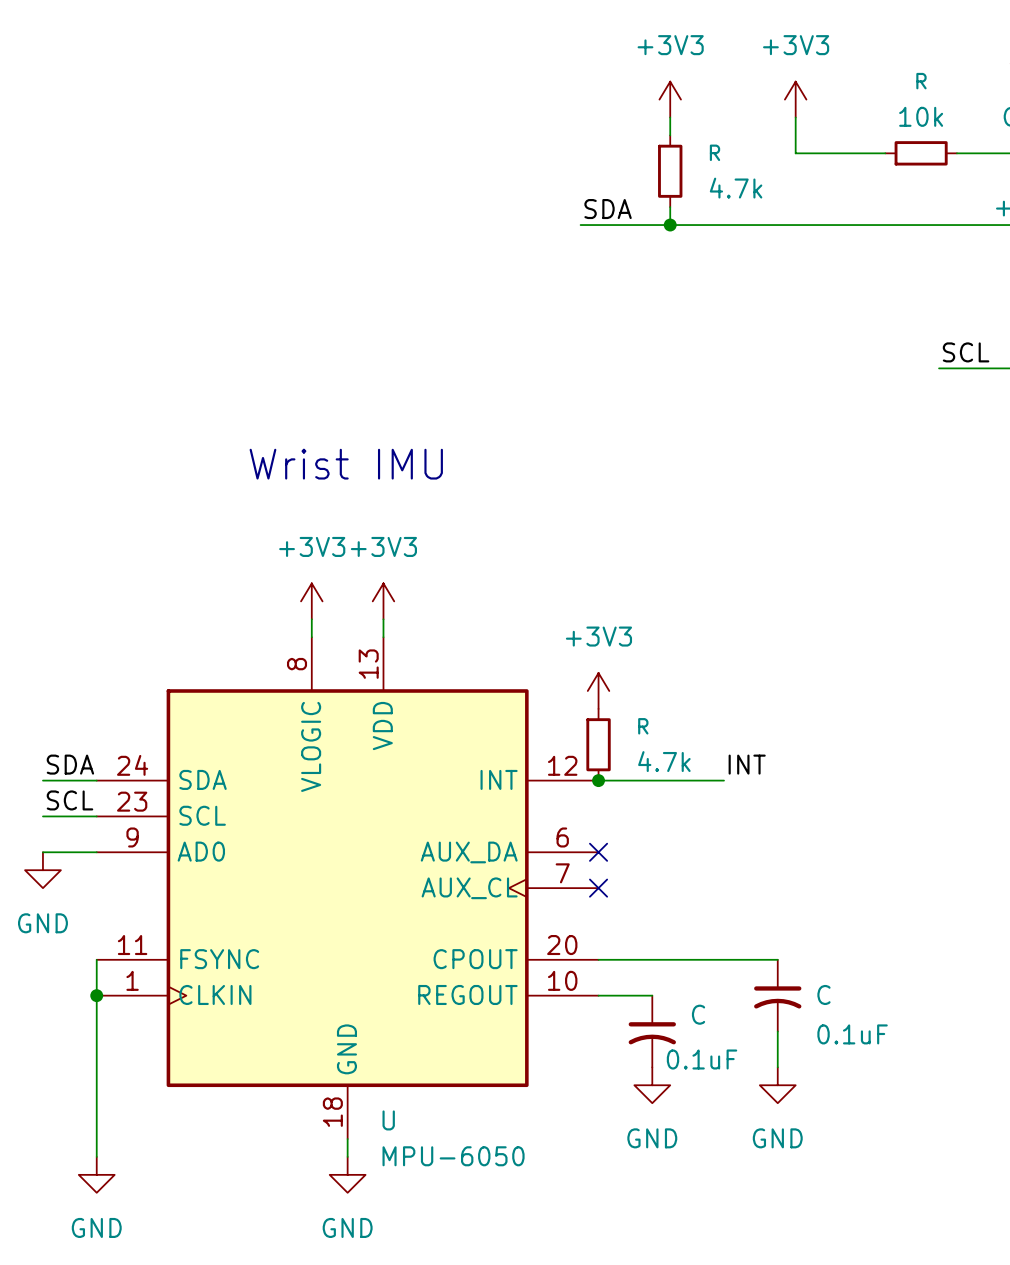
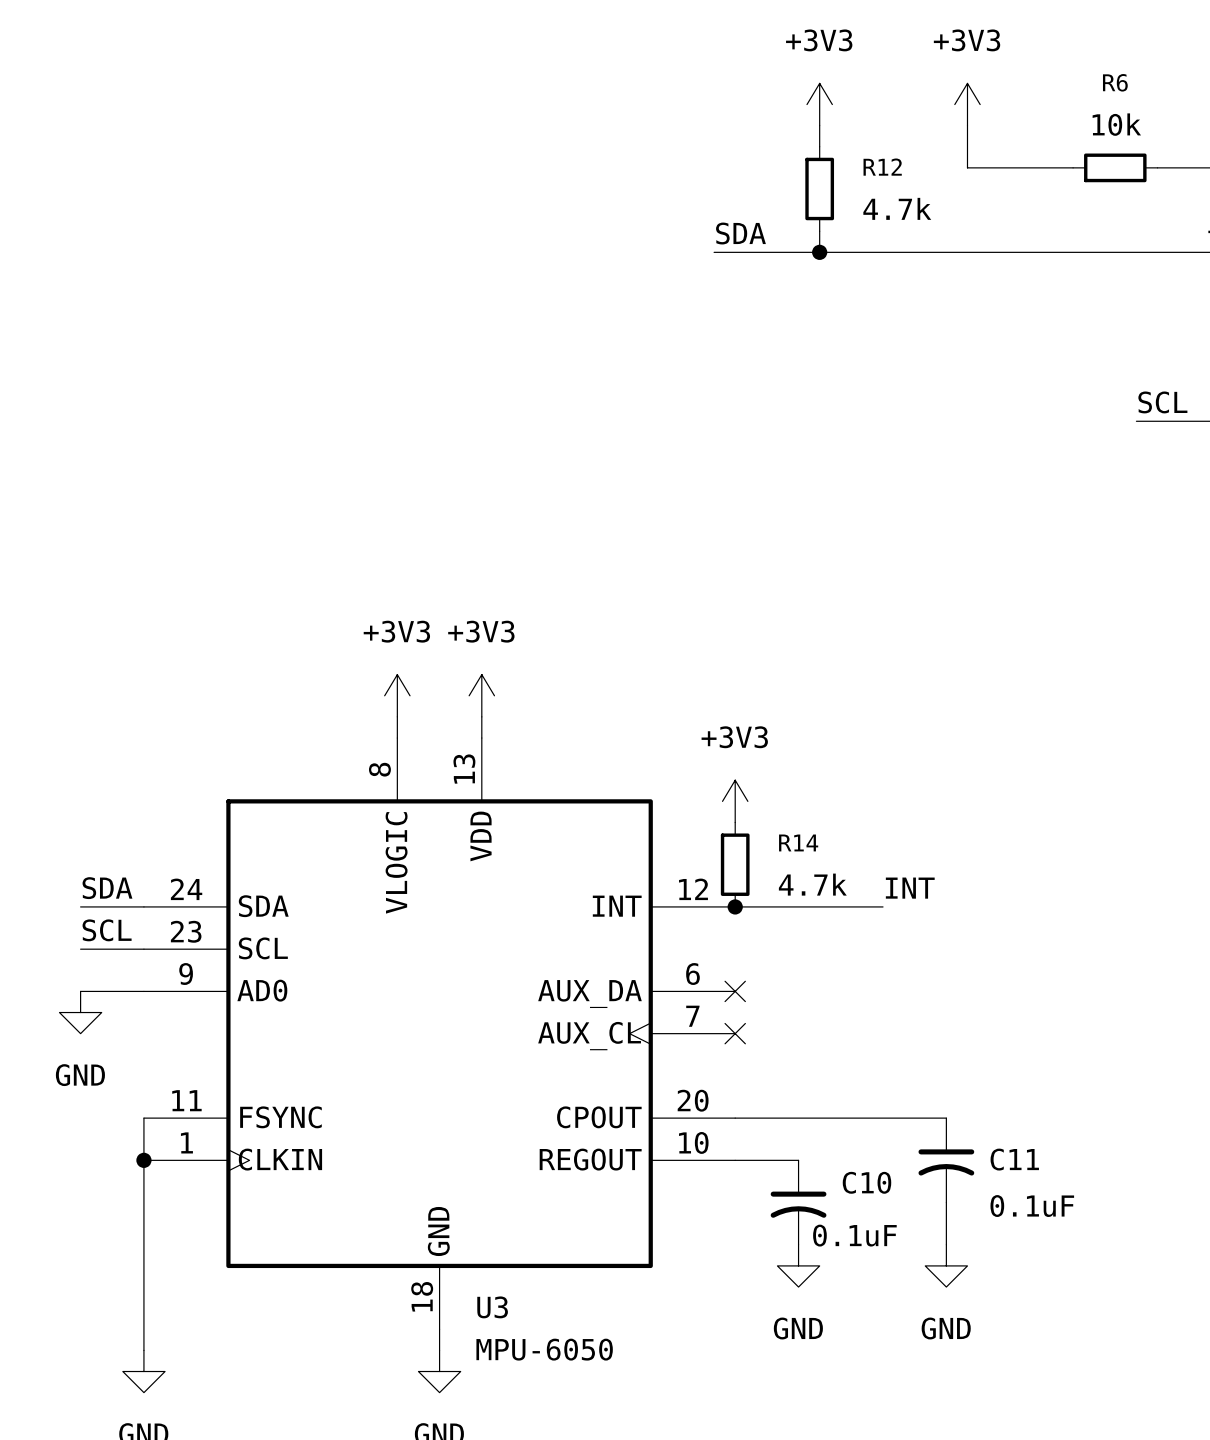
R name: R (921, 81) -> R6 (1115, 82)
R name: R (714, 152) -> R12 (882, 167)
text: Wrist IMU (346, 464) -> none
R name: R (643, 726) -> R14 (798, 842)
C name: C (823, 994) -> C11 (1014, 1159)
C name: C (698, 1014) -> C10 (866, 1182)
U name: U (388, 1120) -> U3 (492, 1307)

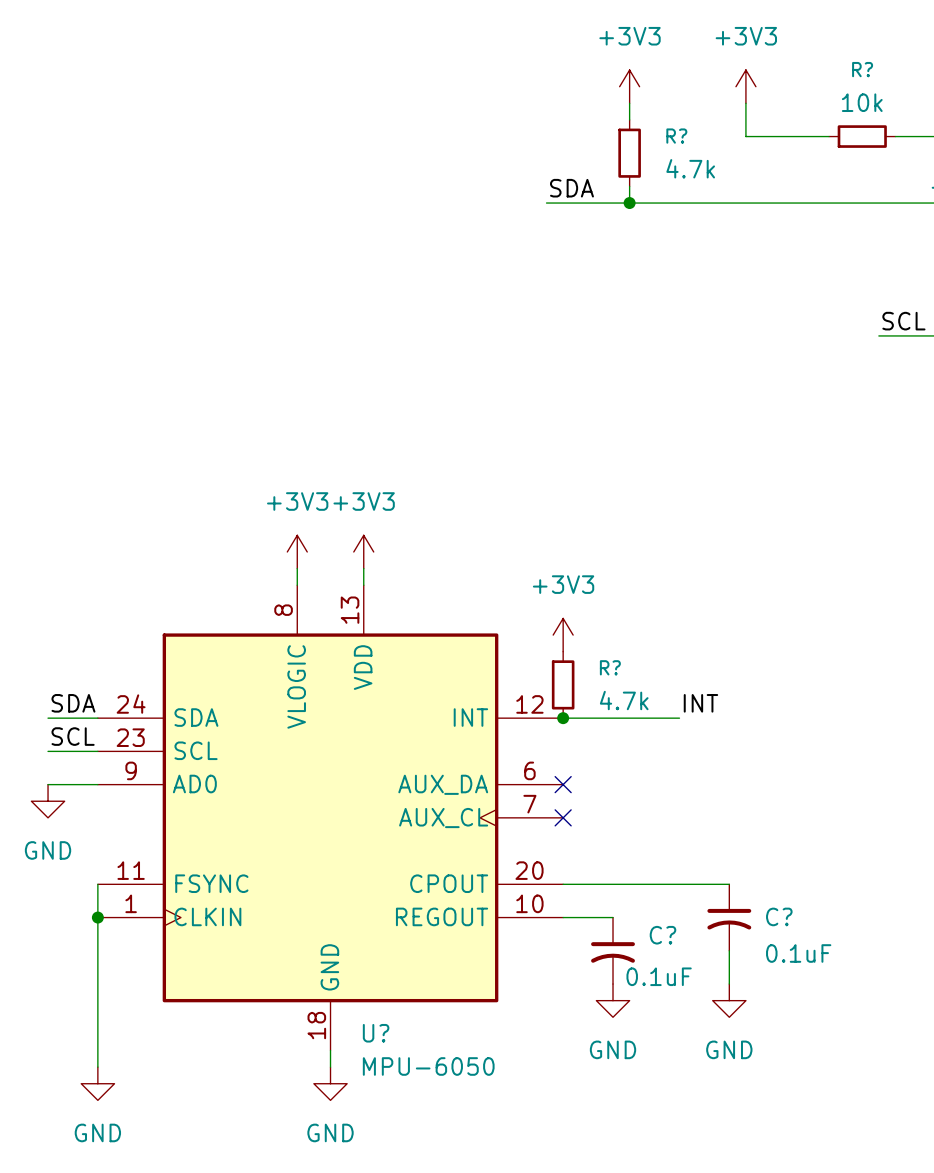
R6 name: R6 (1115, 82) -> R? (862, 69)
R12 name: R12 (882, 167) -> R? (676, 136)
R14 name: R14 (798, 842) -> R? (610, 667)
C11 name: C11 (1014, 1159) -> C? (779, 916)
C10 name: C10 (866, 1182) -> C? (662, 935)
U3 name: U3 (492, 1307) -> U? (376, 1033)

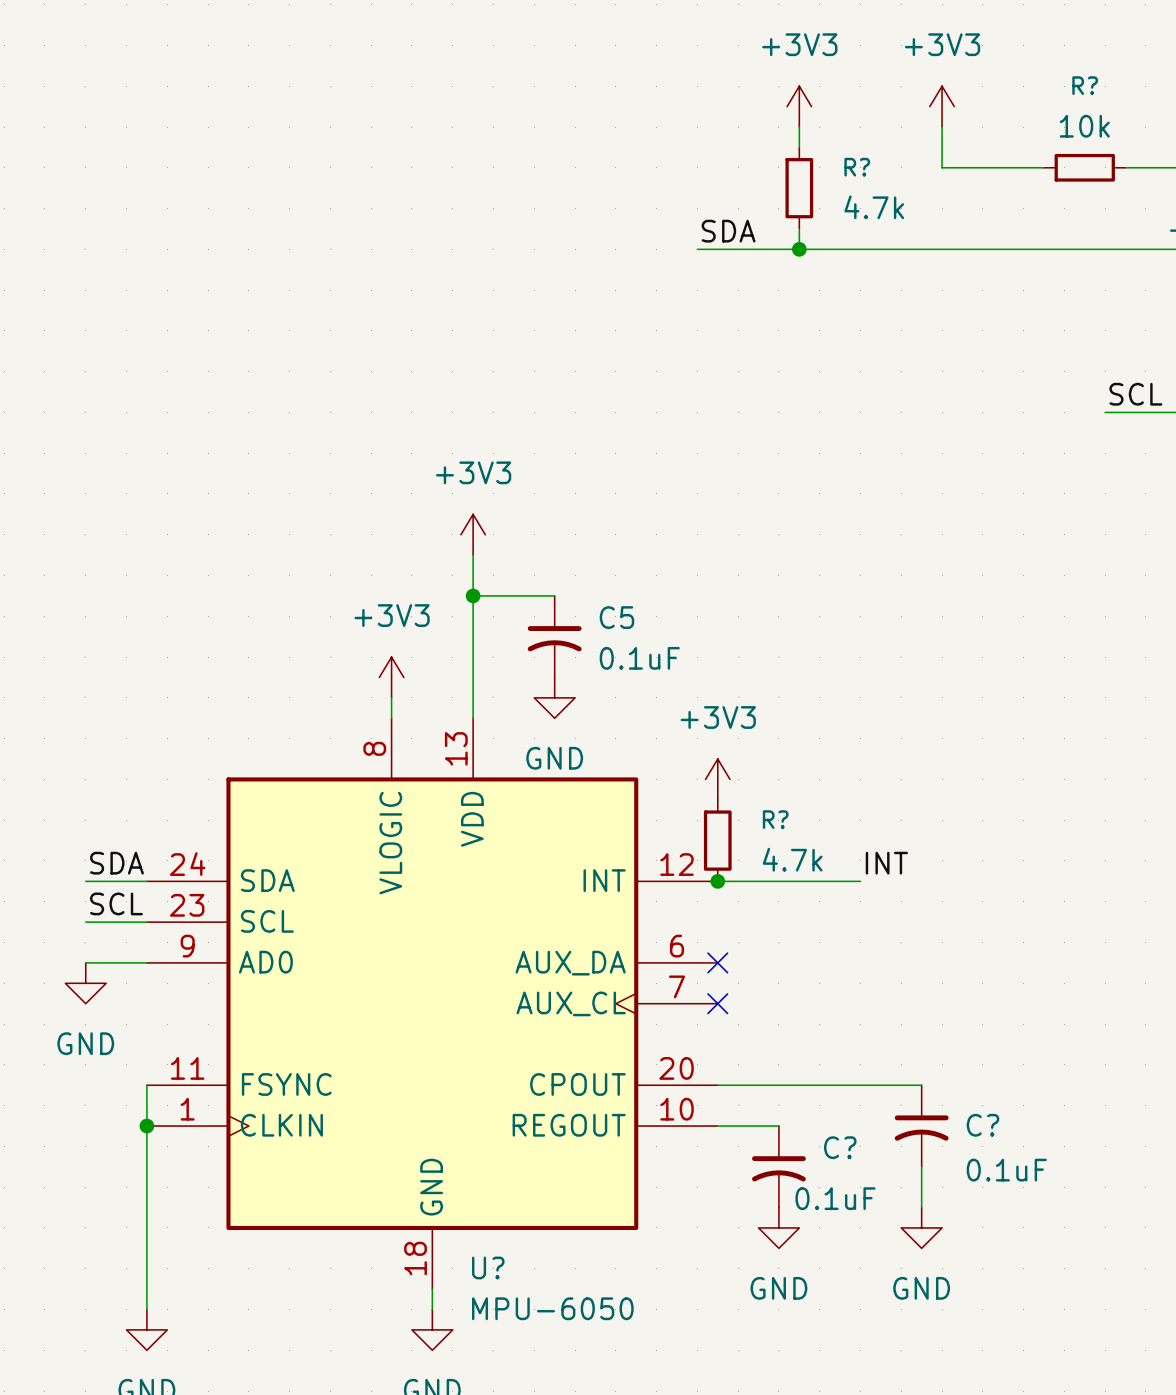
wire: none -> (473, 555) (473, 697)
wire: none -> (473, 595) (554, 595)
junction: none -> (473, 595)
C5: none -> 0.1uF (554, 636)
power symbol position: +3V3 (363, 551) -> +3V3 (473, 534)
power symbol: none -> GND (554, 697)

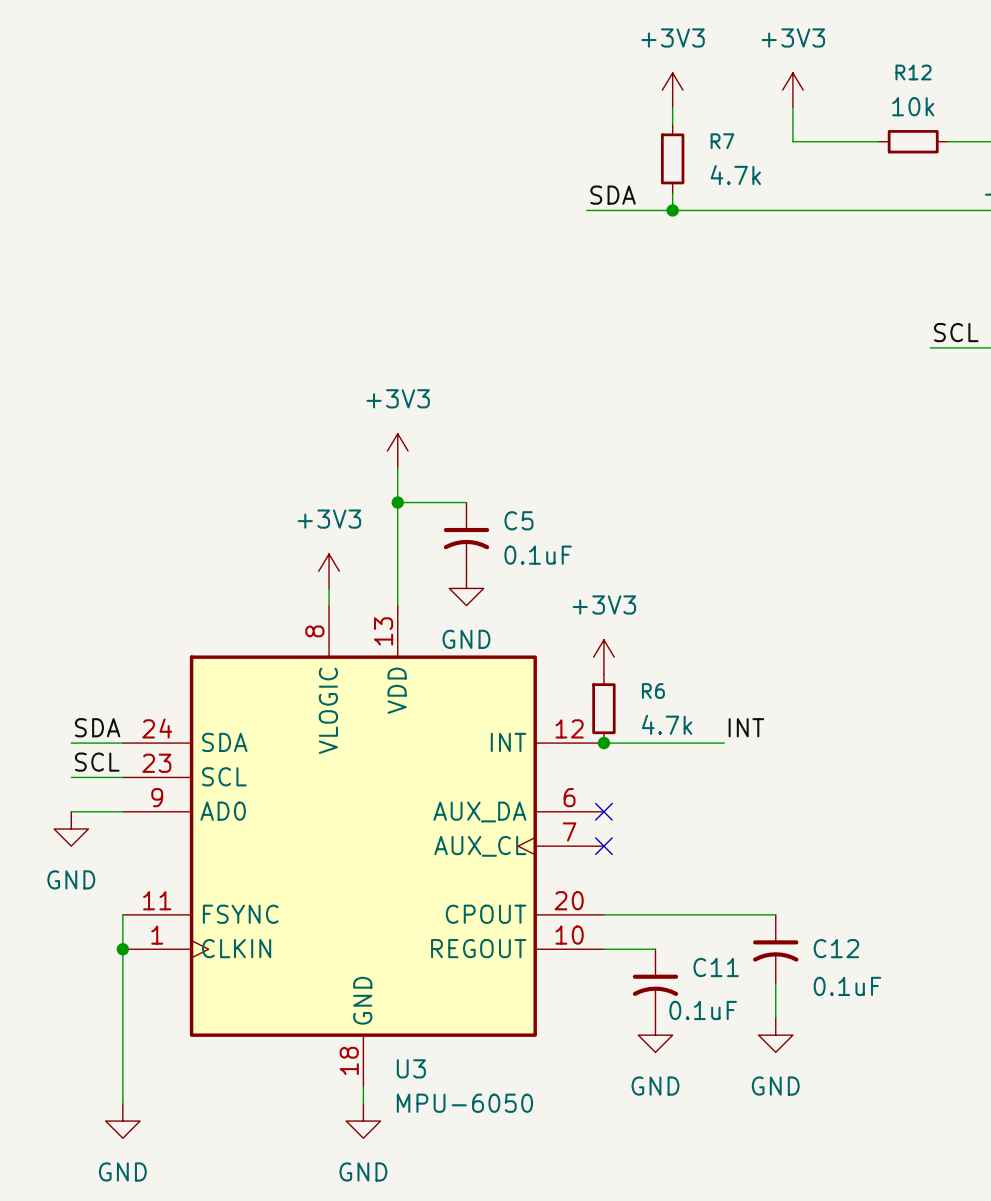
R? name: R? (1085, 85) -> R12 (913, 72)
R? name: R? (857, 167) -> R7 (722, 141)
R? name: R? (775, 819) -> R6 (653, 691)
C? name: C? (982, 1125) -> C12 (836, 948)
C? name: C? (840, 1147) -> C11 (716, 967)
U? name: U? (488, 1267) -> U3 (411, 1068)

